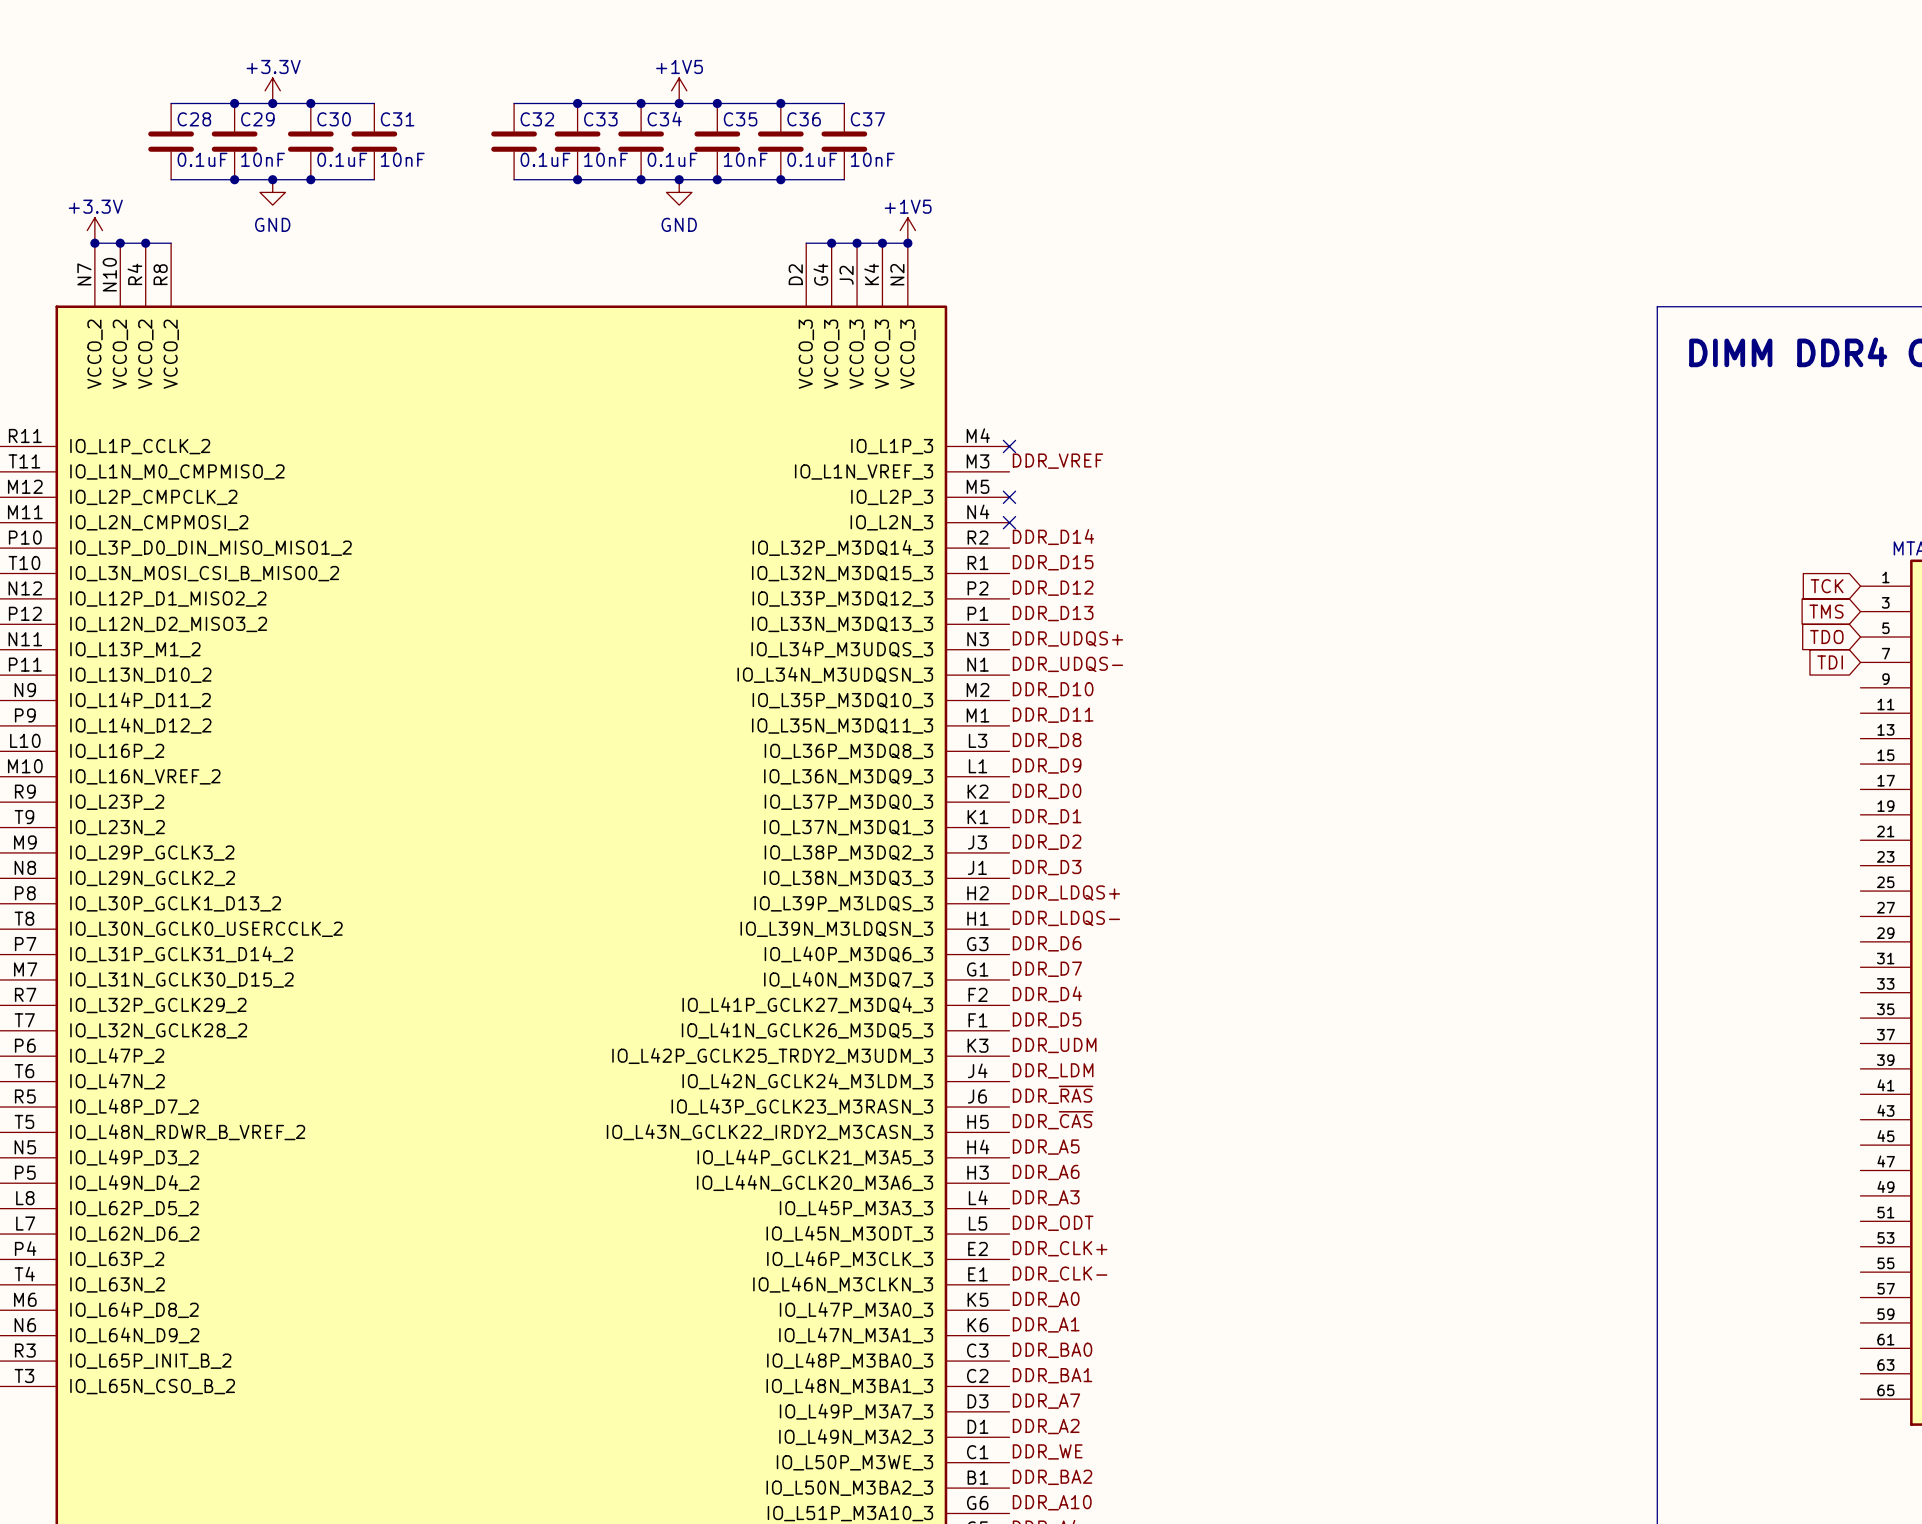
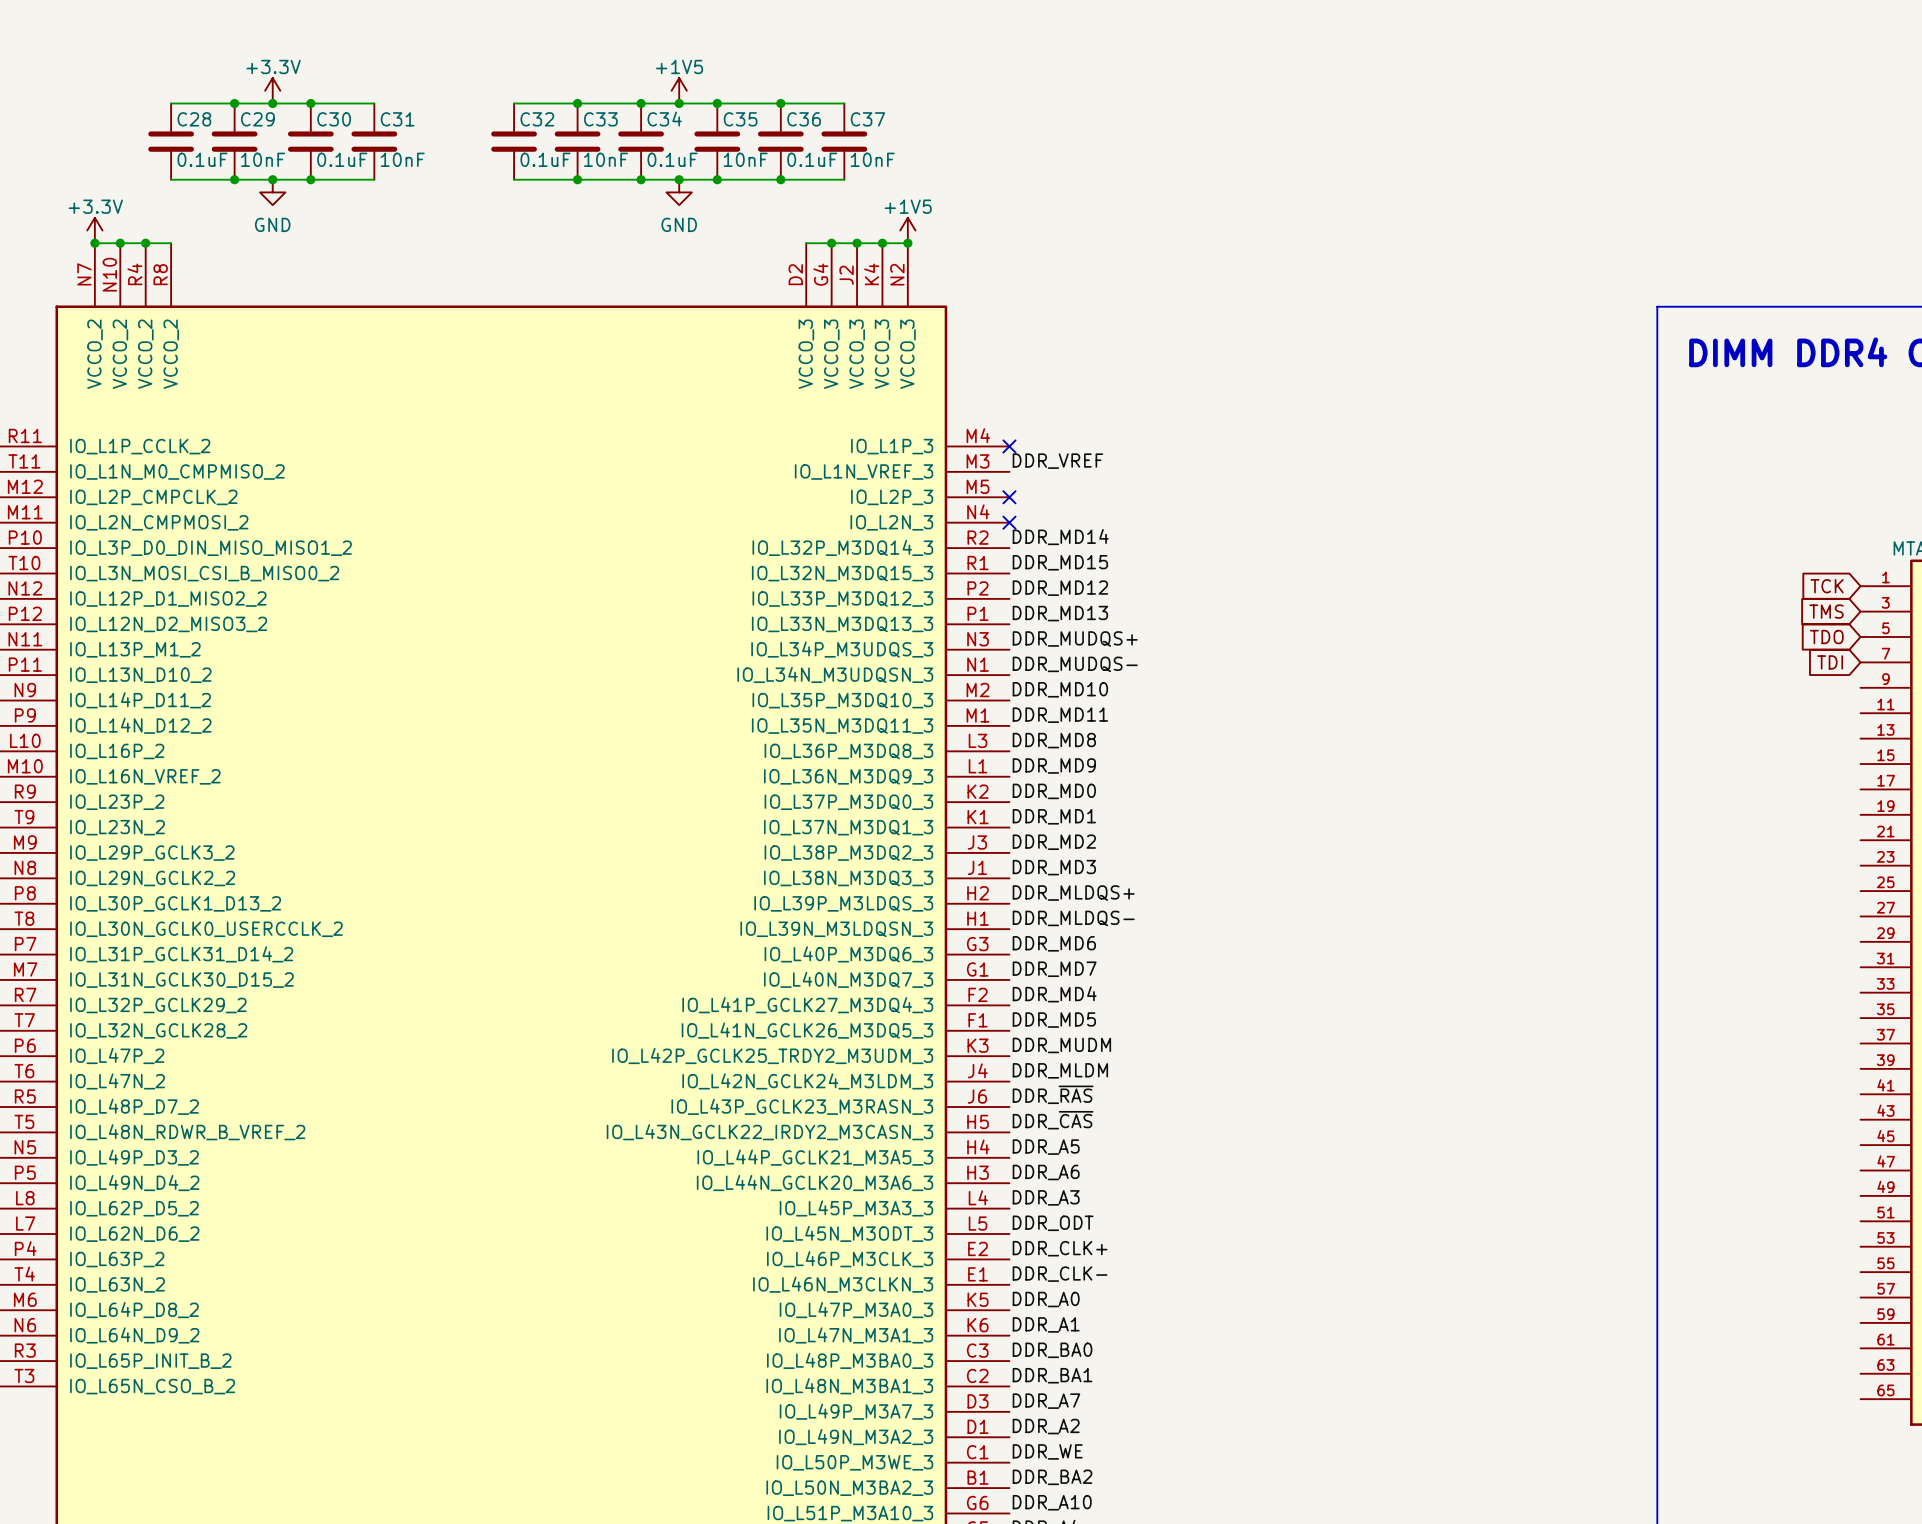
label: DDR_D14 (1053, 537) -> DDR_MD14 (1060, 537)
label: DDR_D15 (1053, 562) -> DDR_MD15 (1060, 562)
label: DDR_D12 (1053, 588) -> DDR_MD12 (1060, 588)
label: DDR_D13 (1053, 613) -> DDR_MD13 (1060, 613)
label: DDR_UDQS+ (1067, 638) -> DDR_MUDQS+ (1075, 638)
label: DDR_UDQS- (1067, 664) -> DDR_MUDQS- (1075, 664)
label: DDR_D10 (1053, 689) -> DDR_MD10 (1060, 689)
label: DDR_D11 (1053, 715) -> DDR_MD11 (1060, 715)
label: DDR_D8 (1047, 740) -> DDR_MD8 (1054, 740)
label: DDR_D9 (1047, 766) -> DDR_MD9 (1054, 766)
label: DDR_D0 (1047, 791) -> DDR_MD0 (1054, 791)
label: DDR_D1 (1047, 816) -> DDR_MD1 (1054, 816)
label: DDR_D2 (1047, 842) -> DDR_MD2 (1054, 842)
label: DDR_D3 (1047, 867) -> DDR_MD3 (1054, 867)
label: DDR_LDQS+ (1066, 893) -> DDR_MLDQS+ (1073, 893)
label: DDR_LDQS- (1066, 918) -> DDR_MLDQS- (1073, 918)
label: DDR_D6 (1047, 943) -> DDR_MD6 (1054, 943)
label: DDR_D7 (1047, 969) -> DDR_MD7 (1054, 969)
label: DDR_D4 (1047, 994) -> DDR_MD4 (1054, 994)
label: DDR_D5 (1047, 1020) -> DDR_MD5 (1054, 1020)
label: DDR_UDM (1054, 1045) -> DDR_MUDM (1061, 1045)
label: DDR_LDM (1053, 1070) -> DDR_MLDM (1060, 1070)

